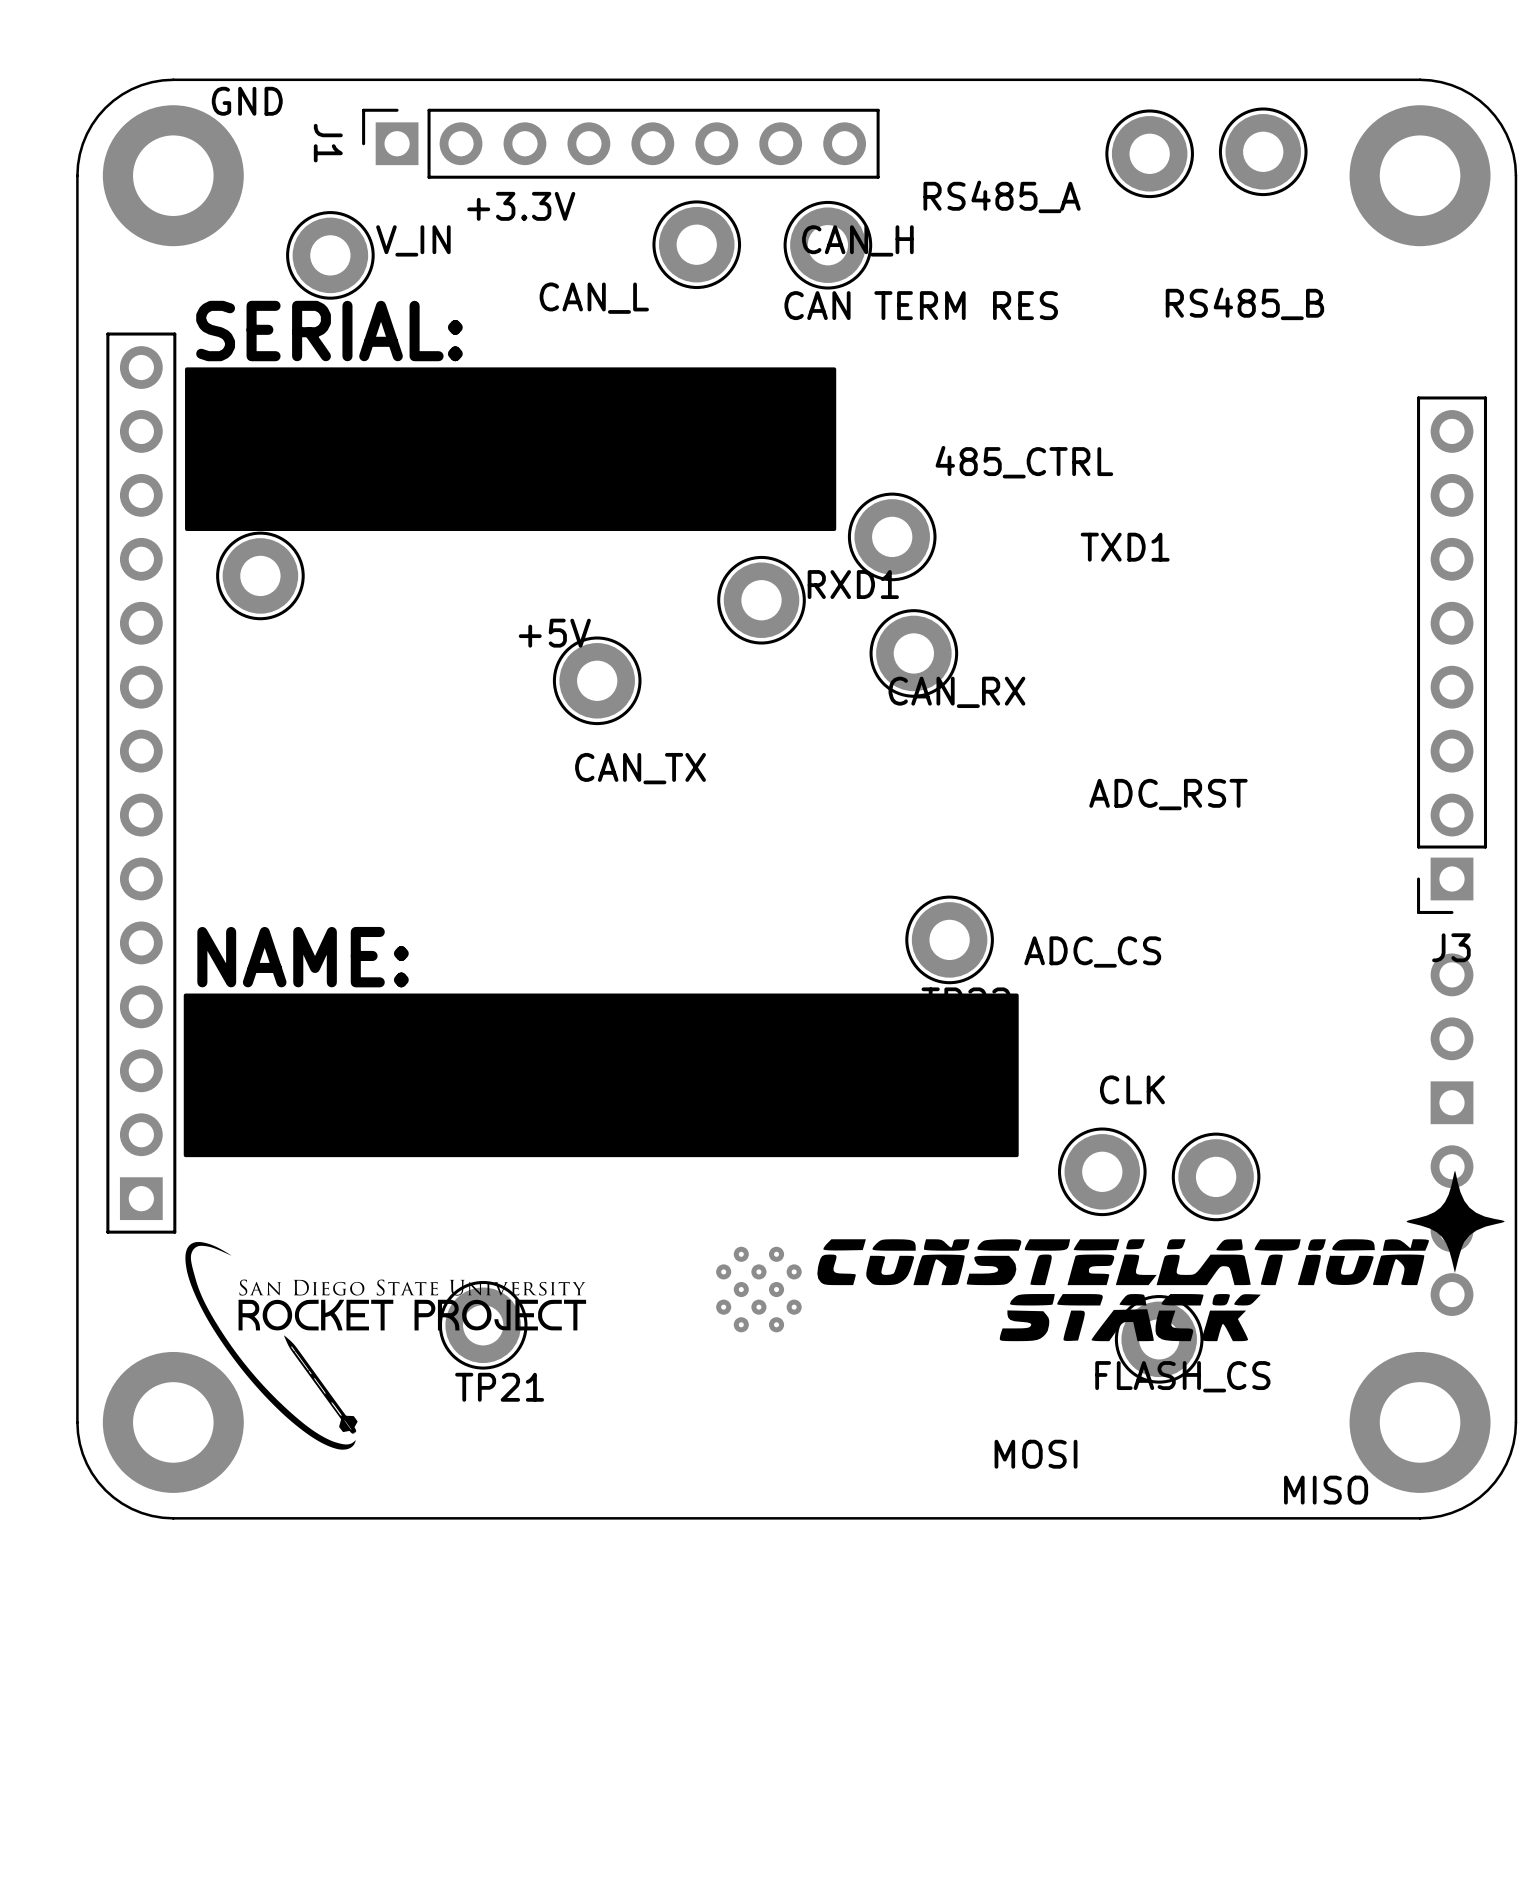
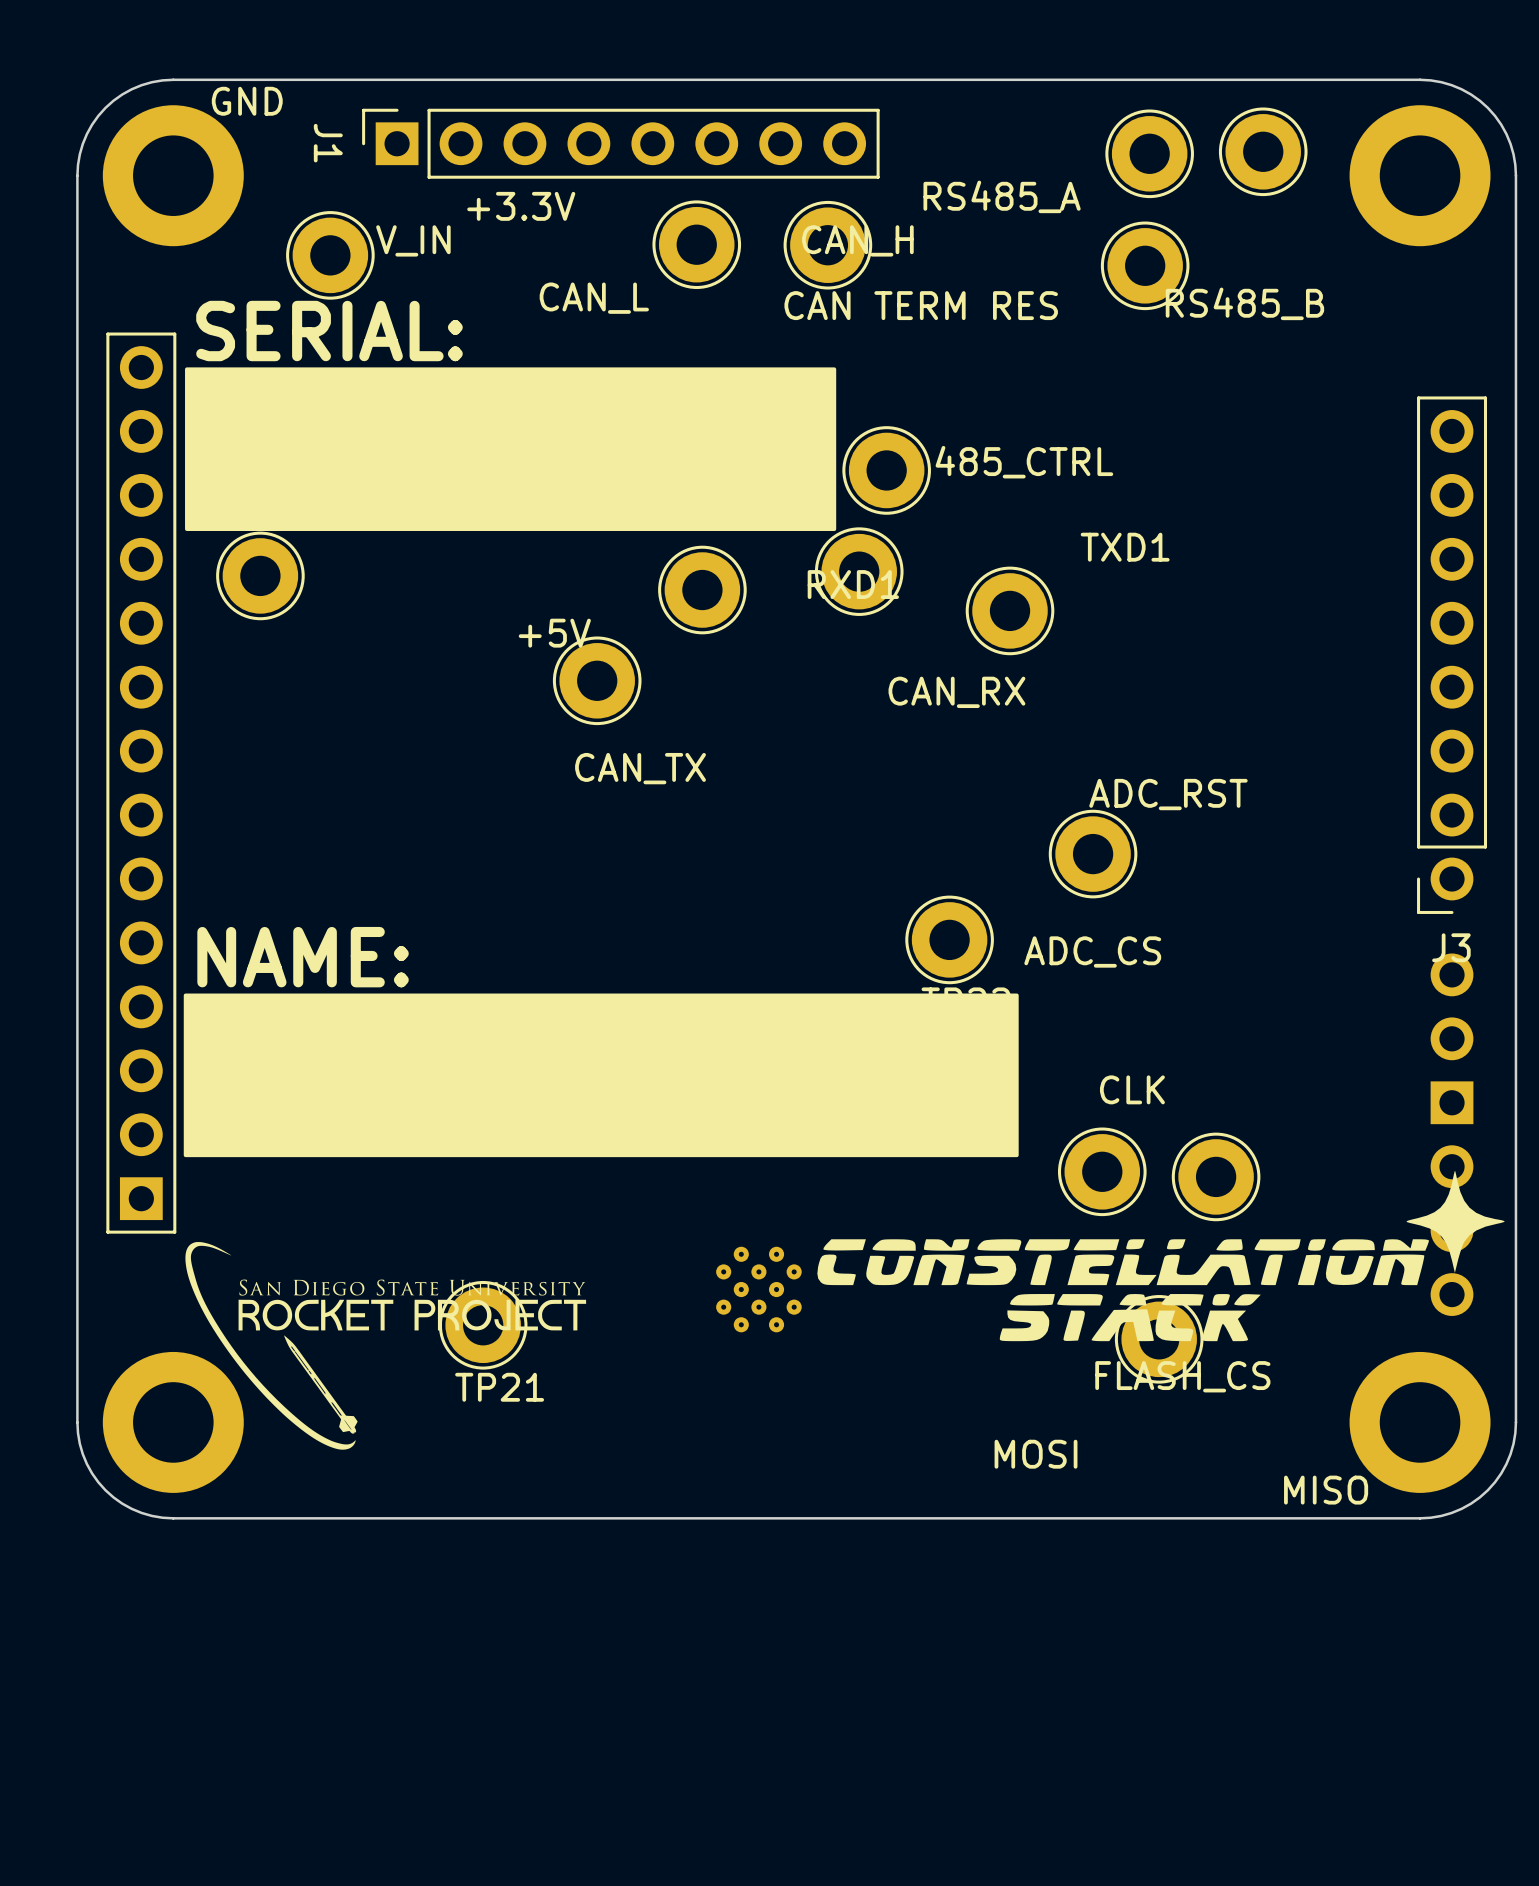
part: none -> (1145, 265)
J3 footprint: [1417, 396, 1488, 914] -> [1417, 396, 1488, 914]
part: none -> (886, 470)
part: (892, 536) -> none
part: none -> (859, 571)
part: none -> (702, 590)
part: (761, 600) -> none
part: none -> (1010, 610)
part: (913, 653) -> none
part: none -> (1093, 854)

